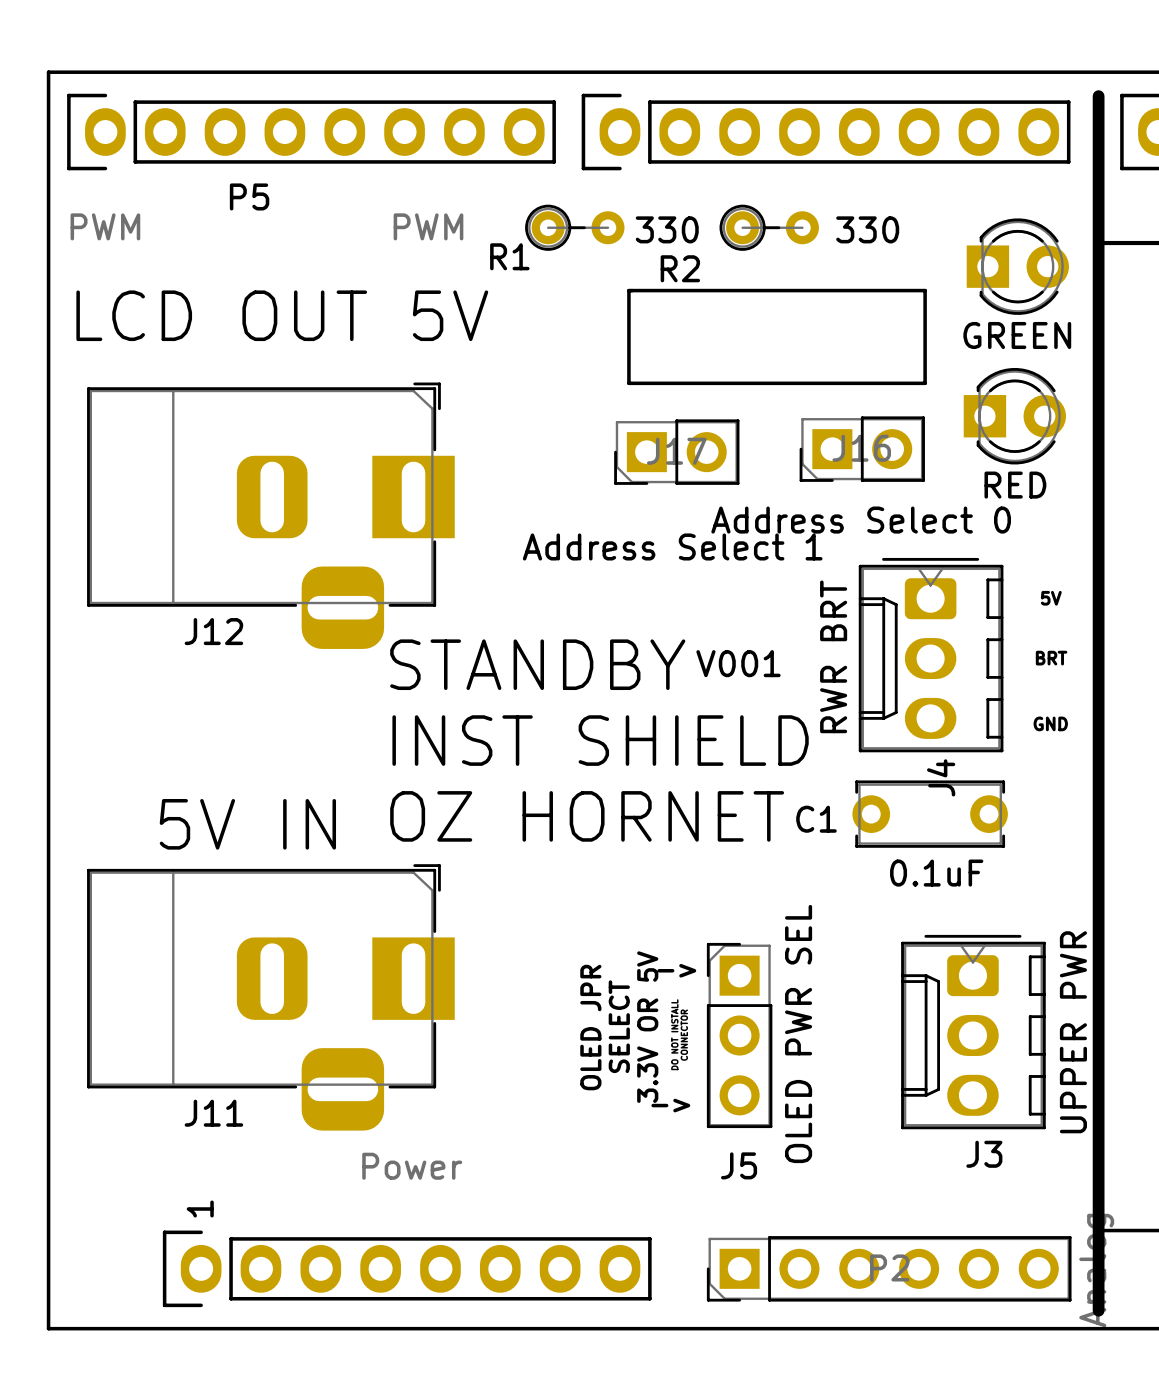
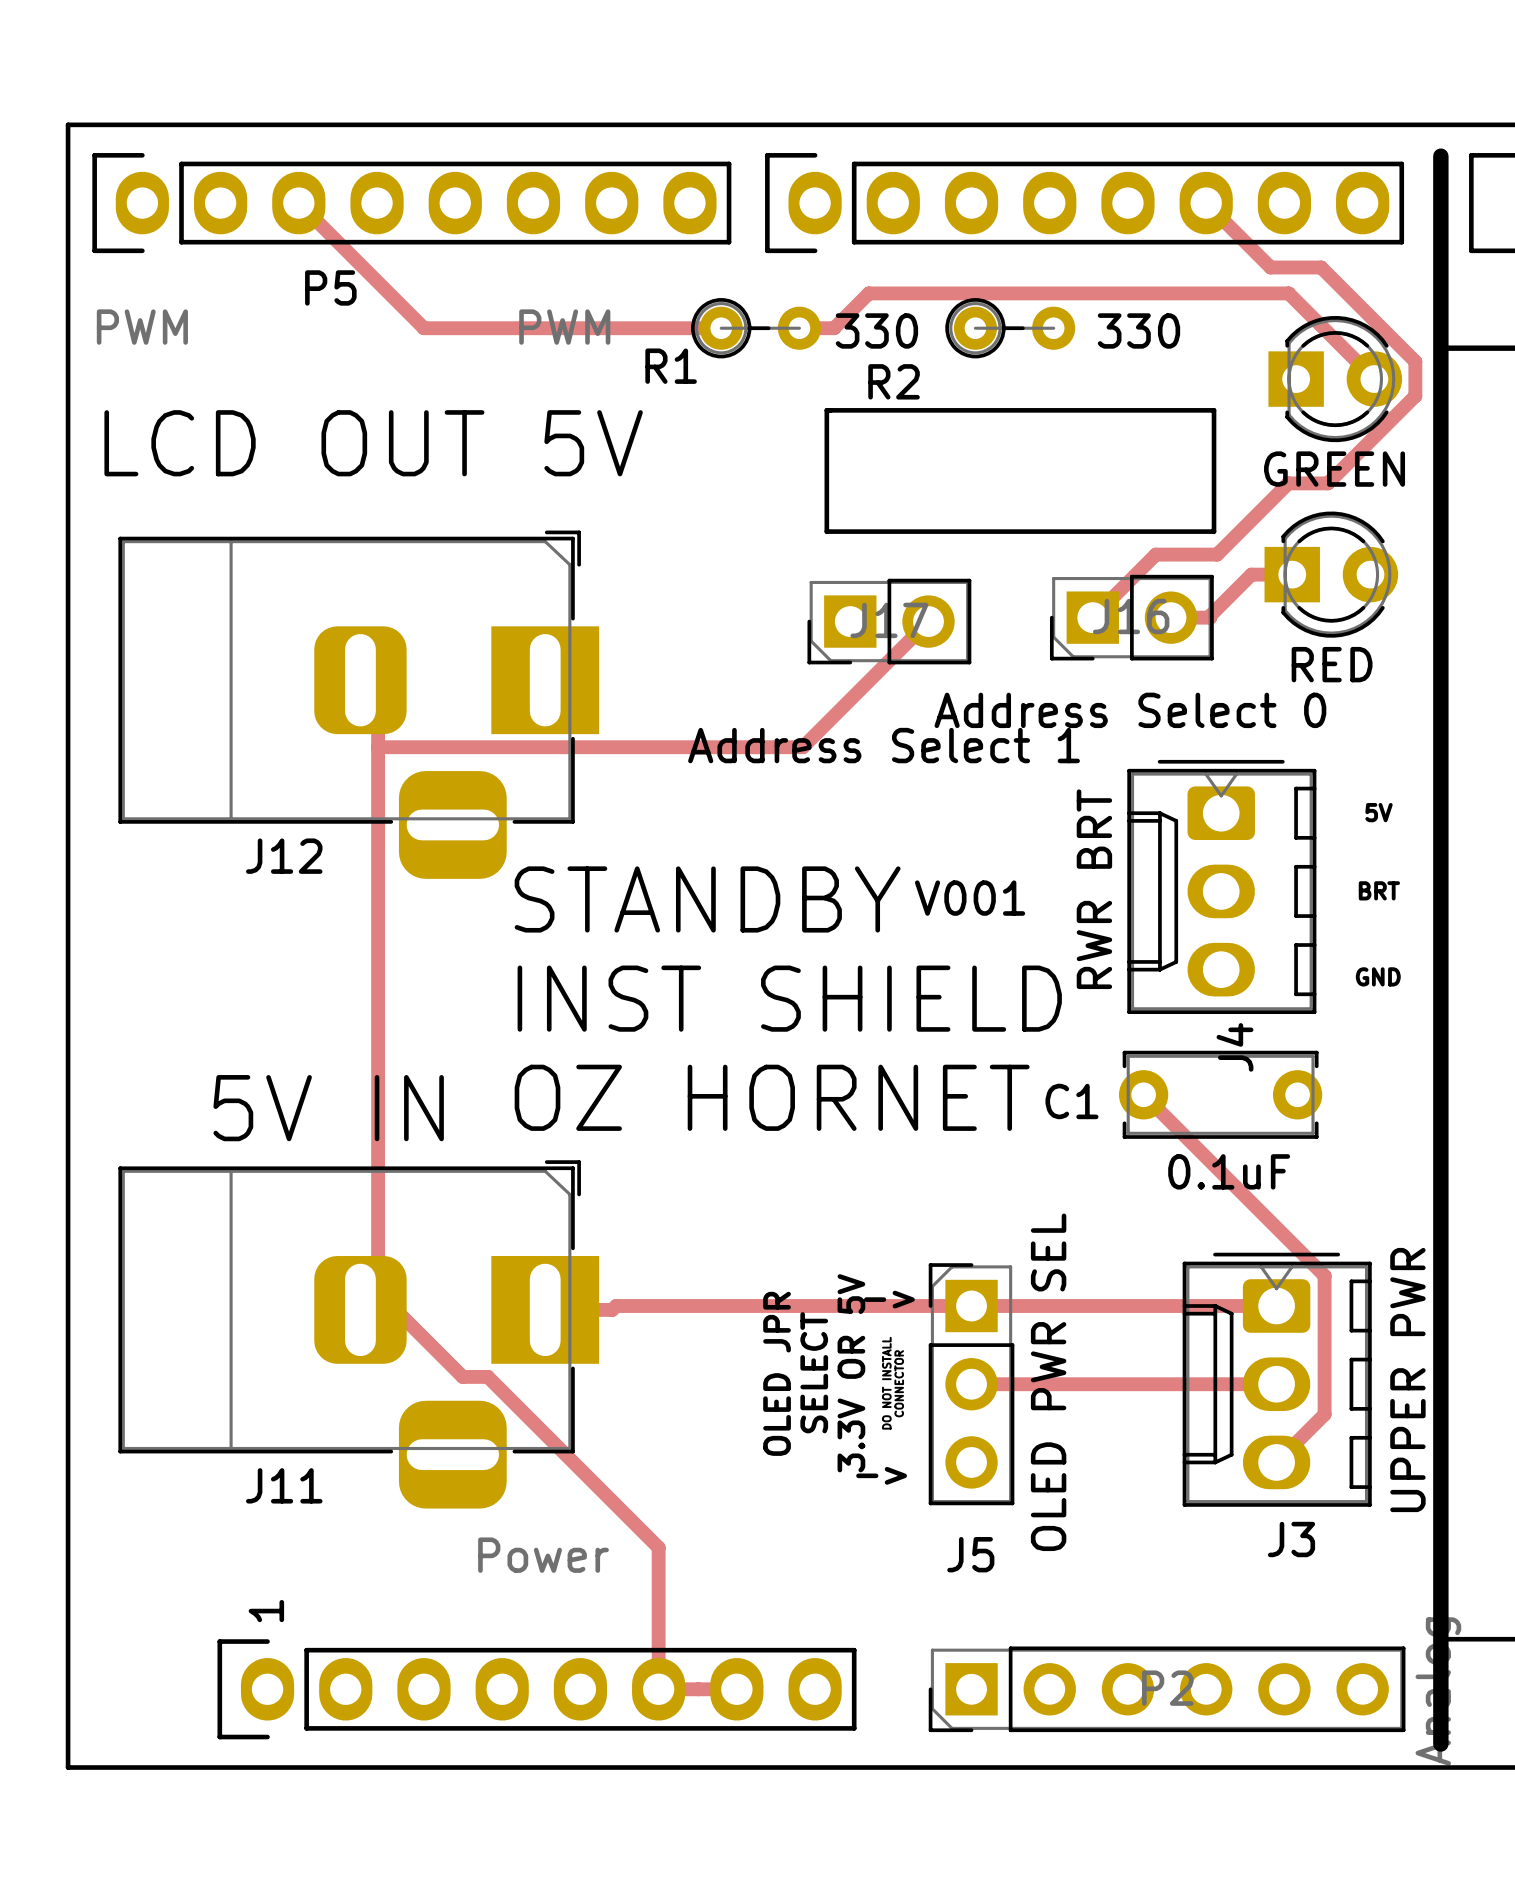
track: none -> (298, 203) (423, 328) (721, 328)
track: none -> (1206, 203) (1270, 267) (1321, 267) (1415, 361) (1415, 395) (1327, 483) (1288, 483) (1217, 554) (1155, 554) (1092, 617)
track: none -> (799, 328) (834, 328) (868, 293) (1288, 293) (1374, 379)
track: none -> (1292, 574) (1251, 574) (1210, 617) (1170, 617)
track: none -> (928, 621) (802, 747) (378, 747)
track: none -> (360, 680) (378, 697) (378, 1292)
track: none -> (1143, 1094) (1324, 1275) (1324, 1414) (1276, 1462)
track: none -> (378, 1292) (462, 1376) (487, 1376) (658, 1547) (658, 1689) (736, 1689)
track: none -> (1276, 1306) (616, 1306) (612, 1309) (545, 1309)
track: none -> (971, 1384) (1276, 1384)

